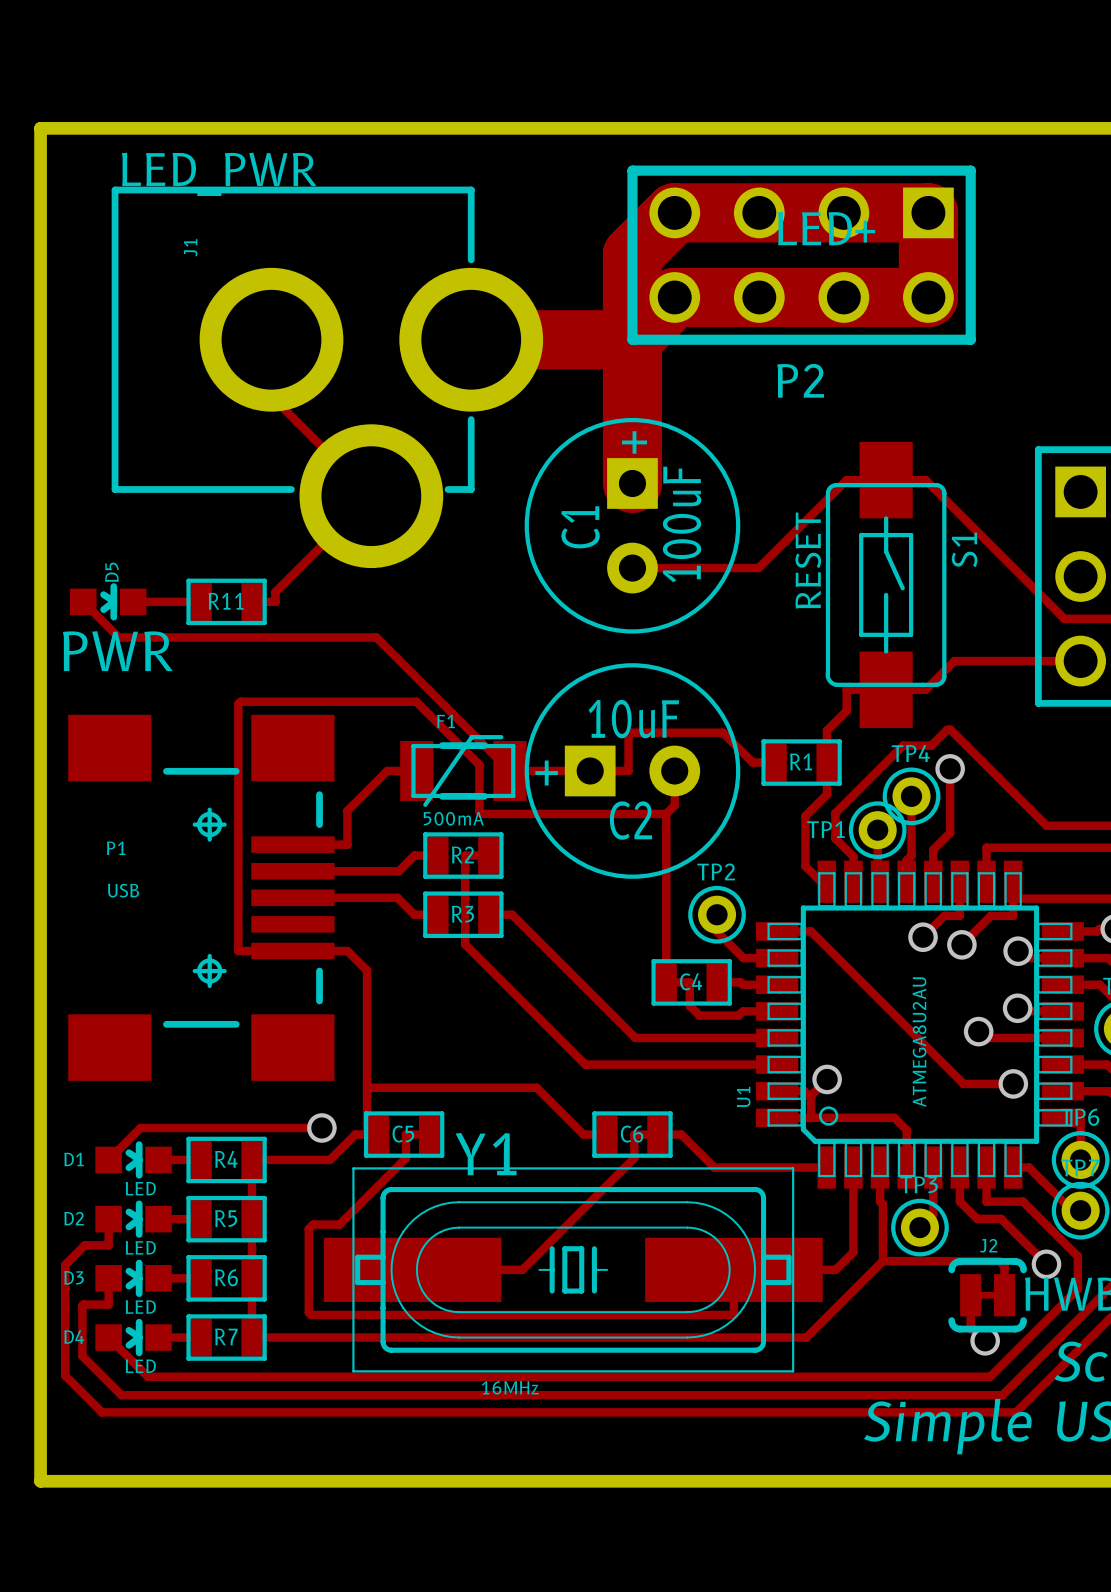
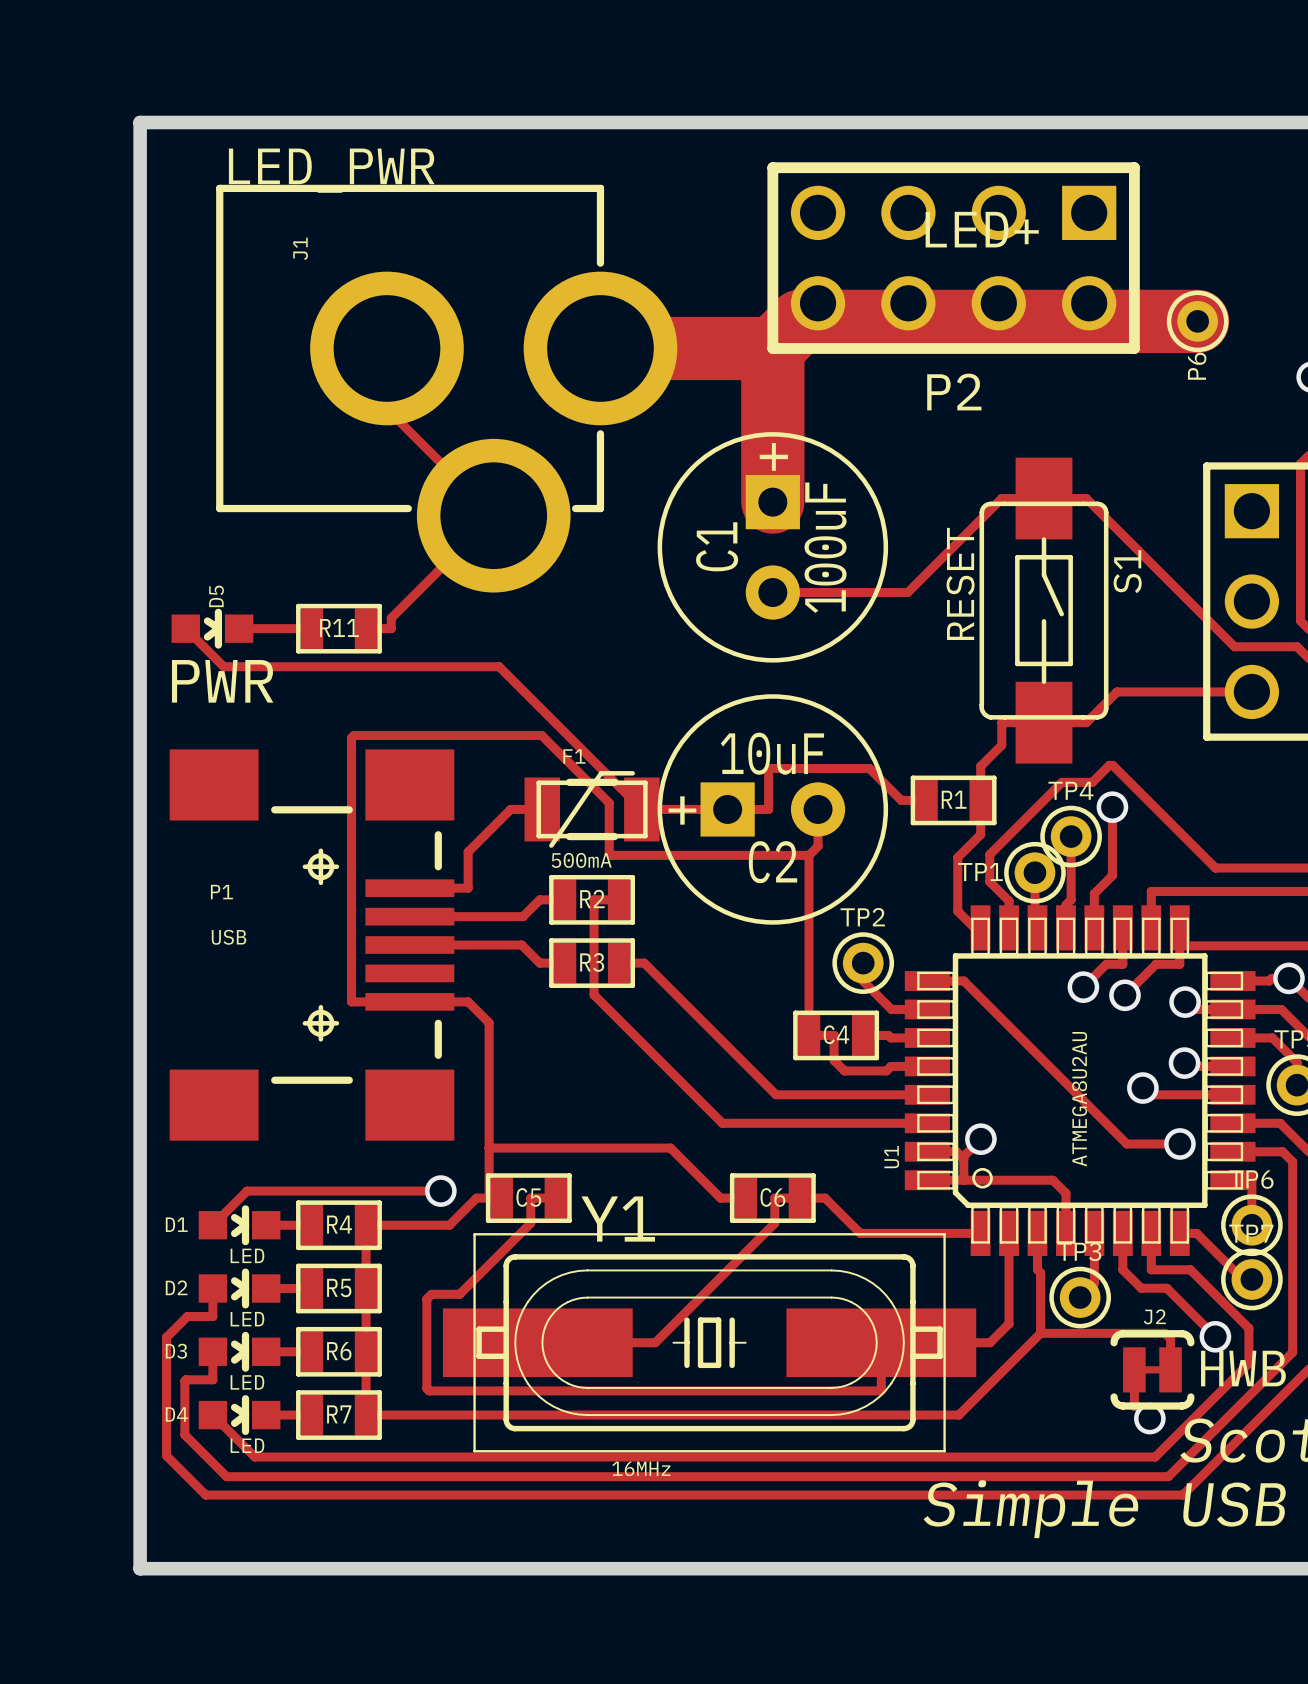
track: (657, 314) (674, 297) (928, 297) (928, 212) (674, 212) (632, 255) (632, 339) -> (799, 321) (1197, 321)
P6: none -> (1197, 321)

